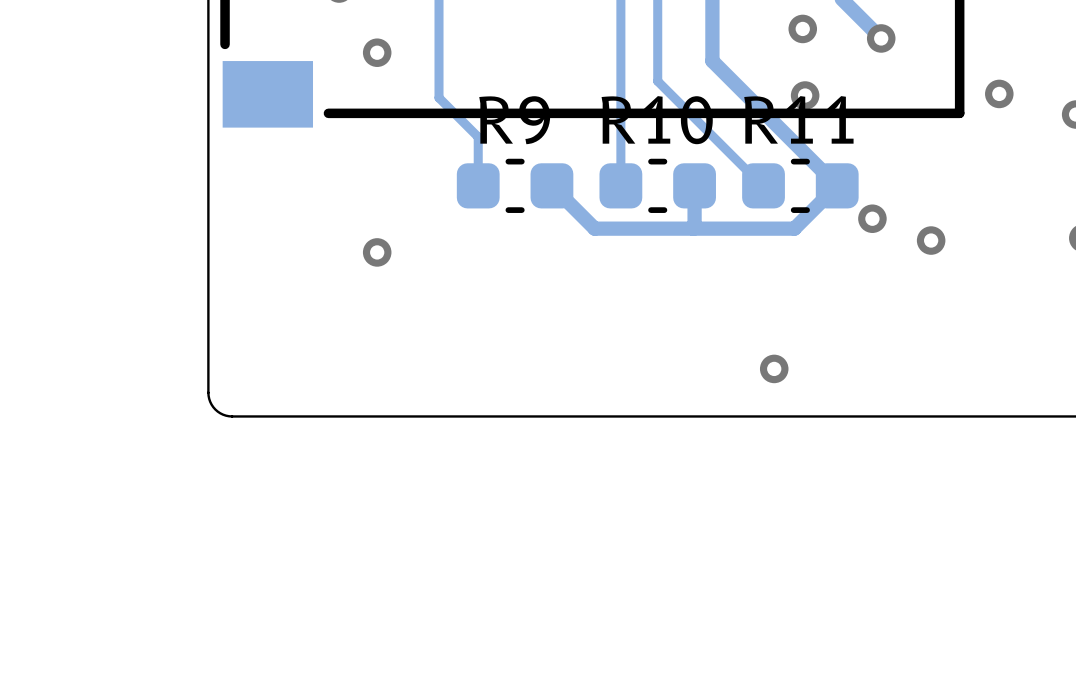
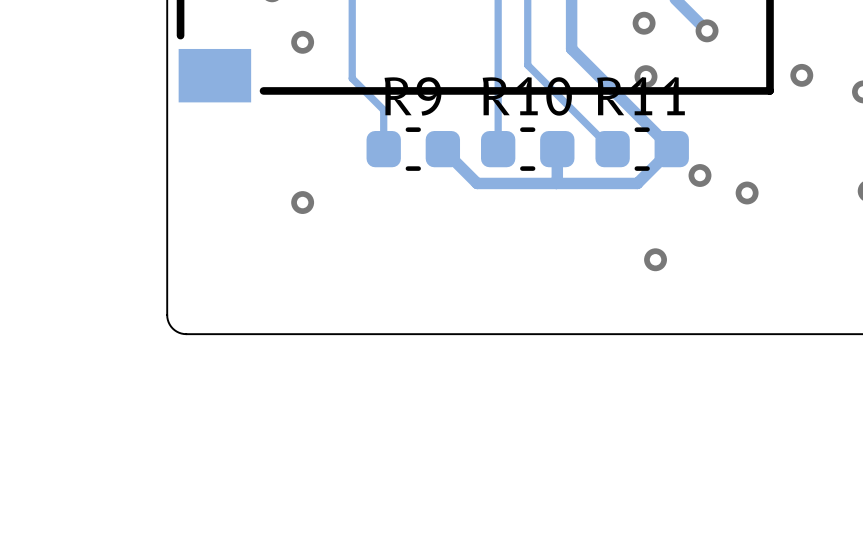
via position: (774, 368) -> (655, 259)

